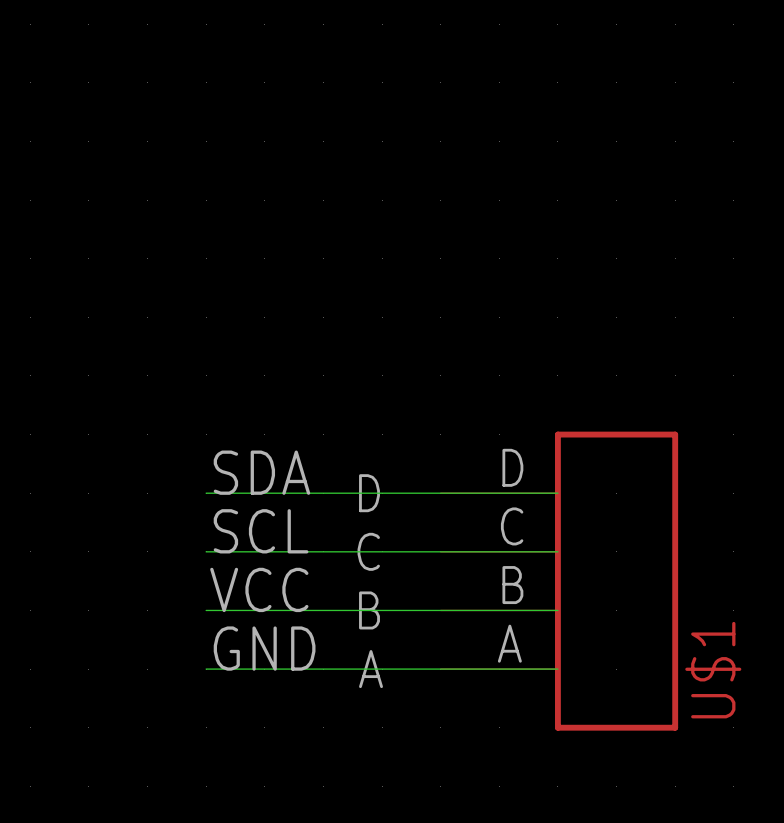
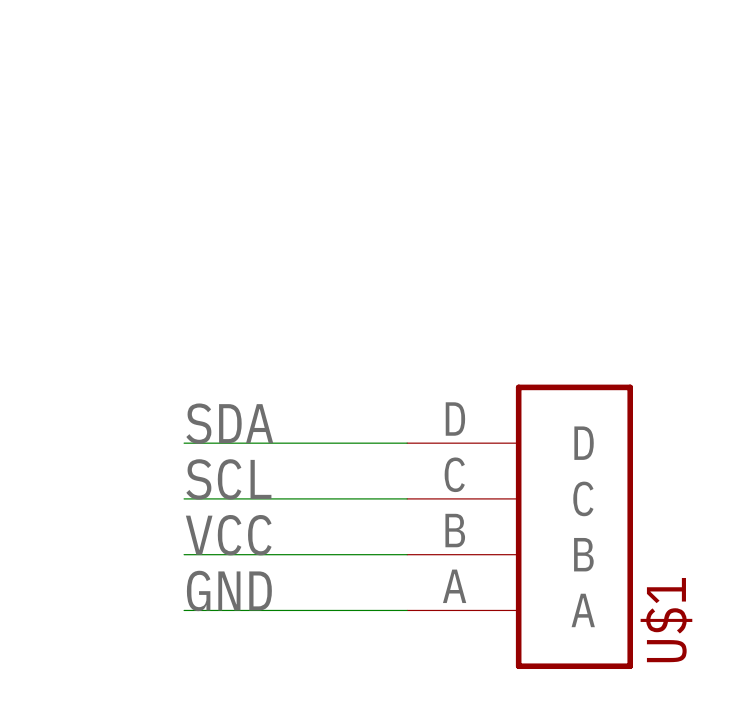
U$1 symbol: [440, 431, 679, 731] -> [407, 384, 633, 670]

